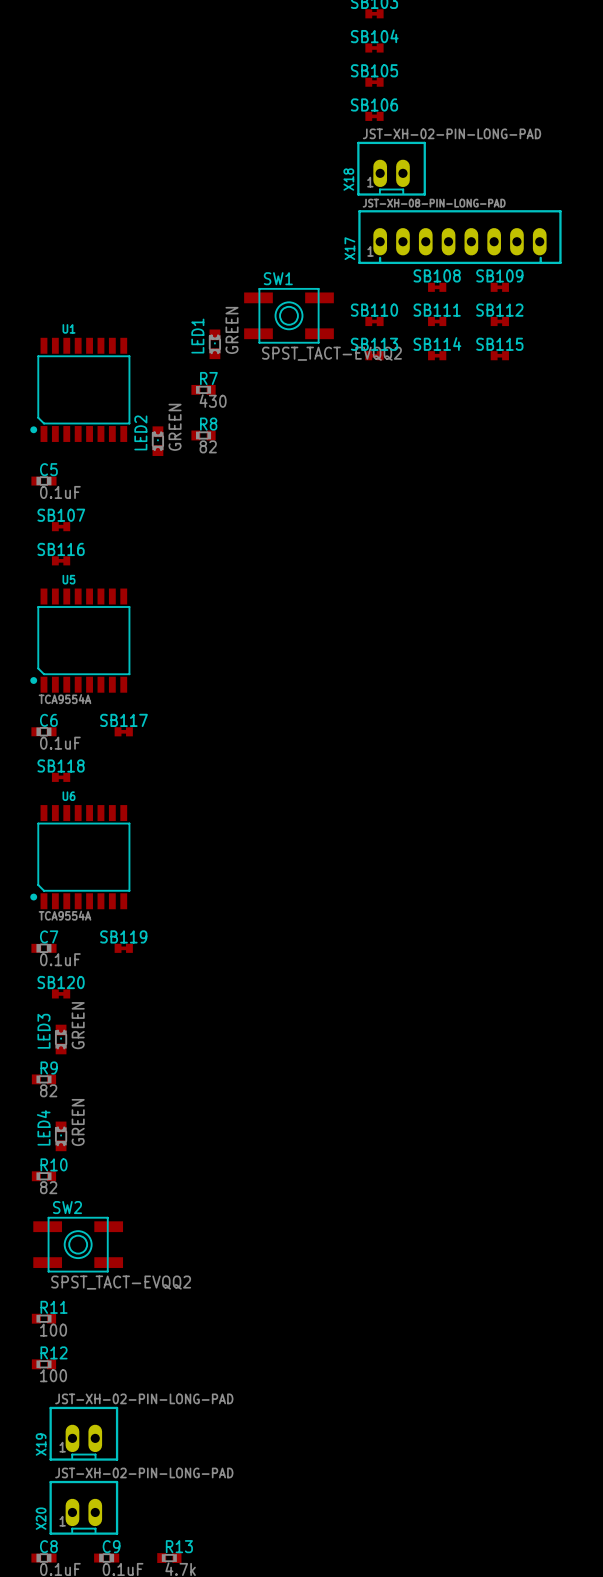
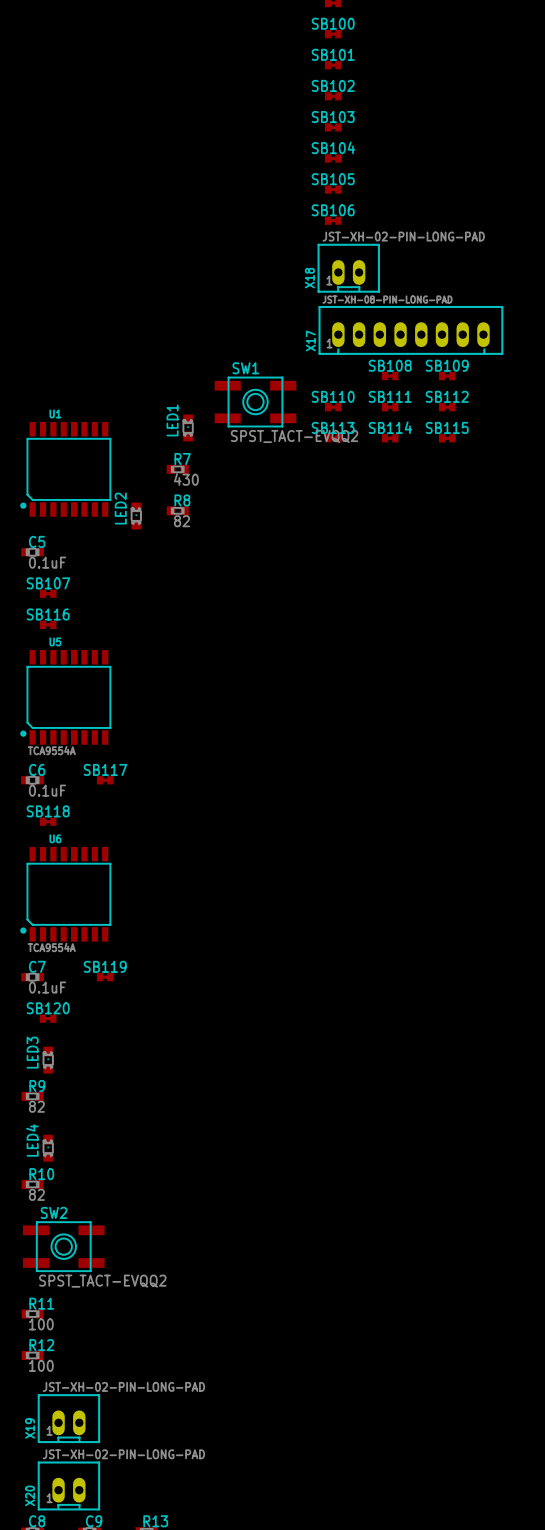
LED1 value: GREEN (232, 330) -> none
LED2 value: GREEN (175, 427) -> none
LED3 value: GREEN (78, 1025) -> none
LED4 value: GREEN (78, 1122) -> none

